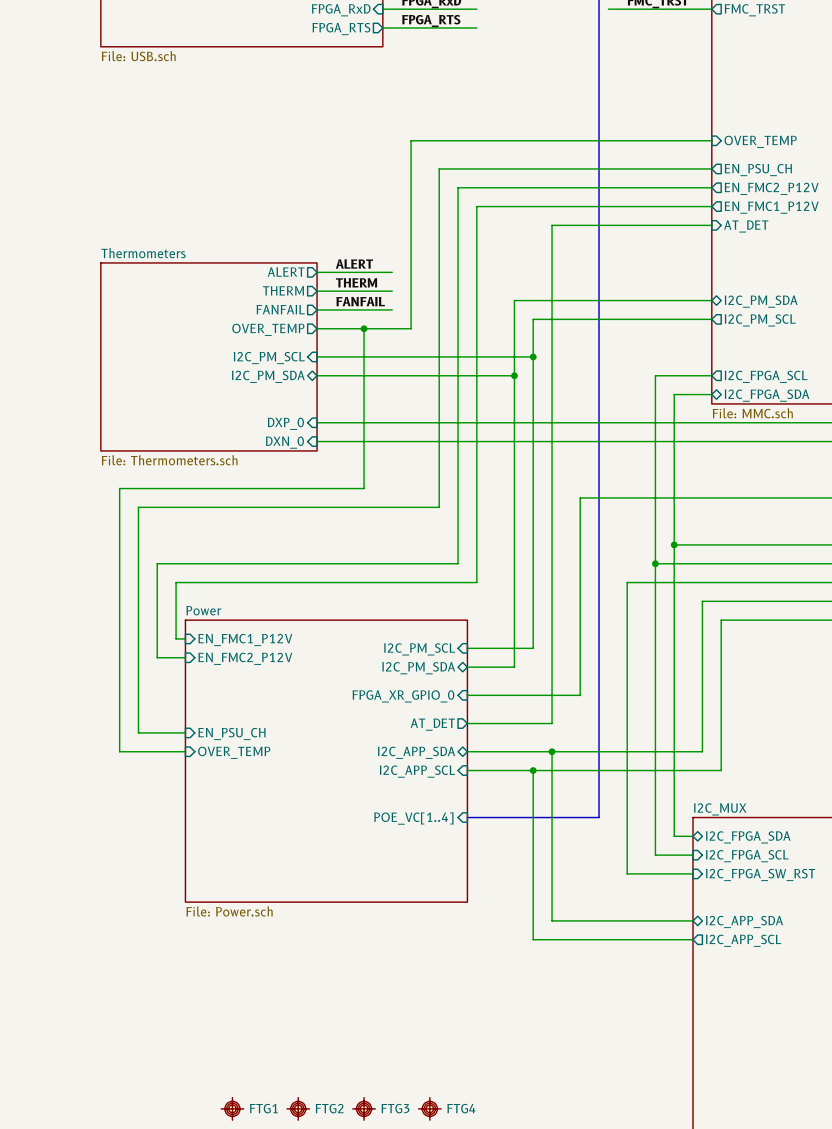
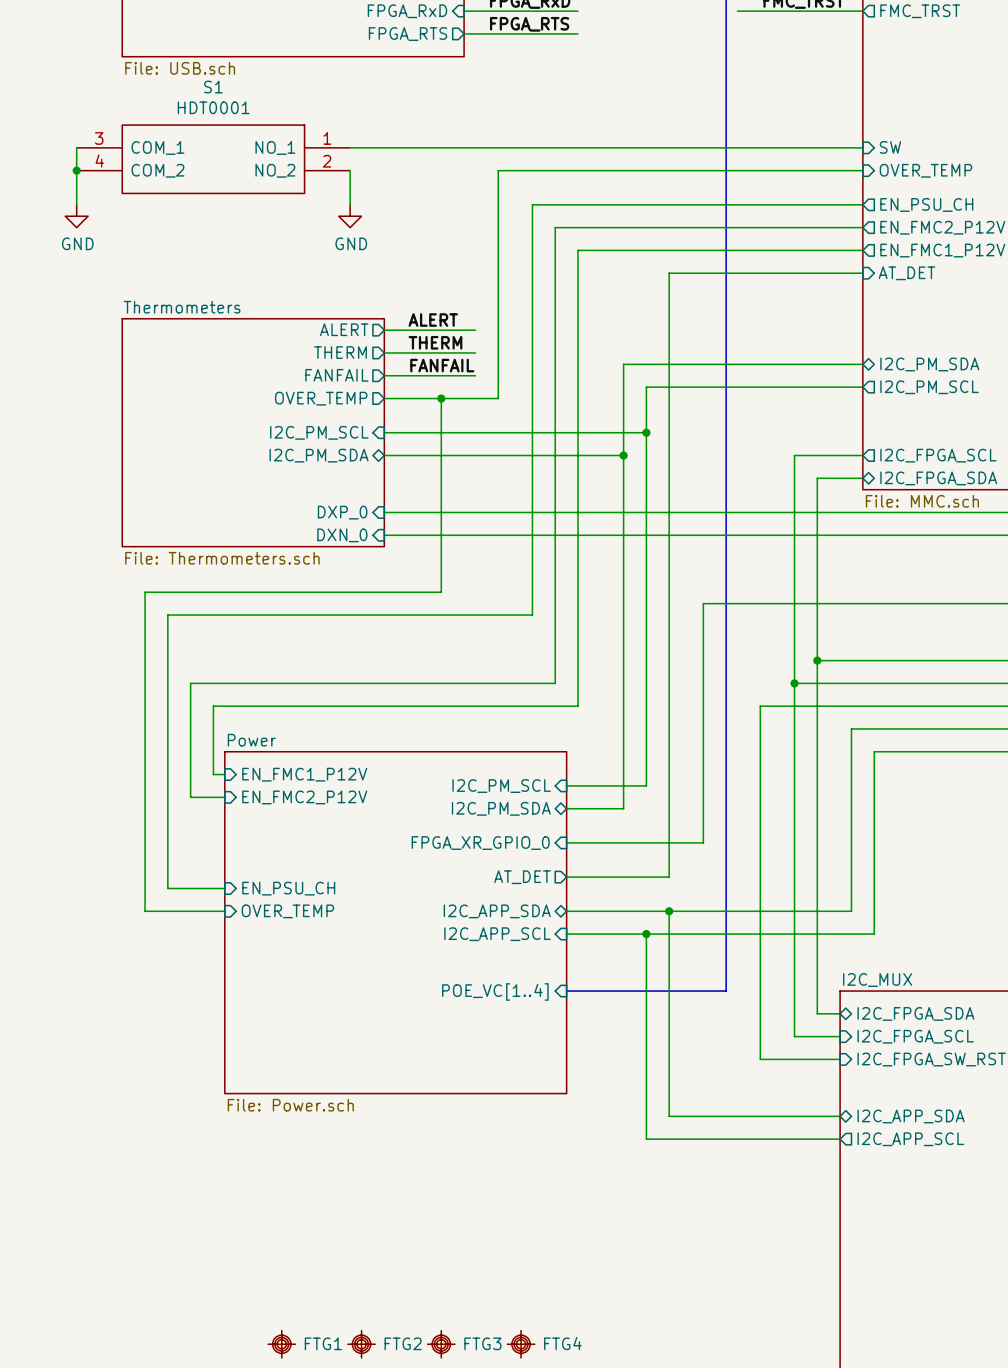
wire: none -> (76, 147) (76, 204)
wire: none -> (350, 147) (862, 147)
sheet pin: none -> SW (890, 147)
S1: none -> HDT0001 (213, 159)
junction: none -> (76, 170)
wire: none -> (350, 170) (350, 204)
power symbol: none -> GND (76, 216)
power symbol: none -> GND (350, 216)

